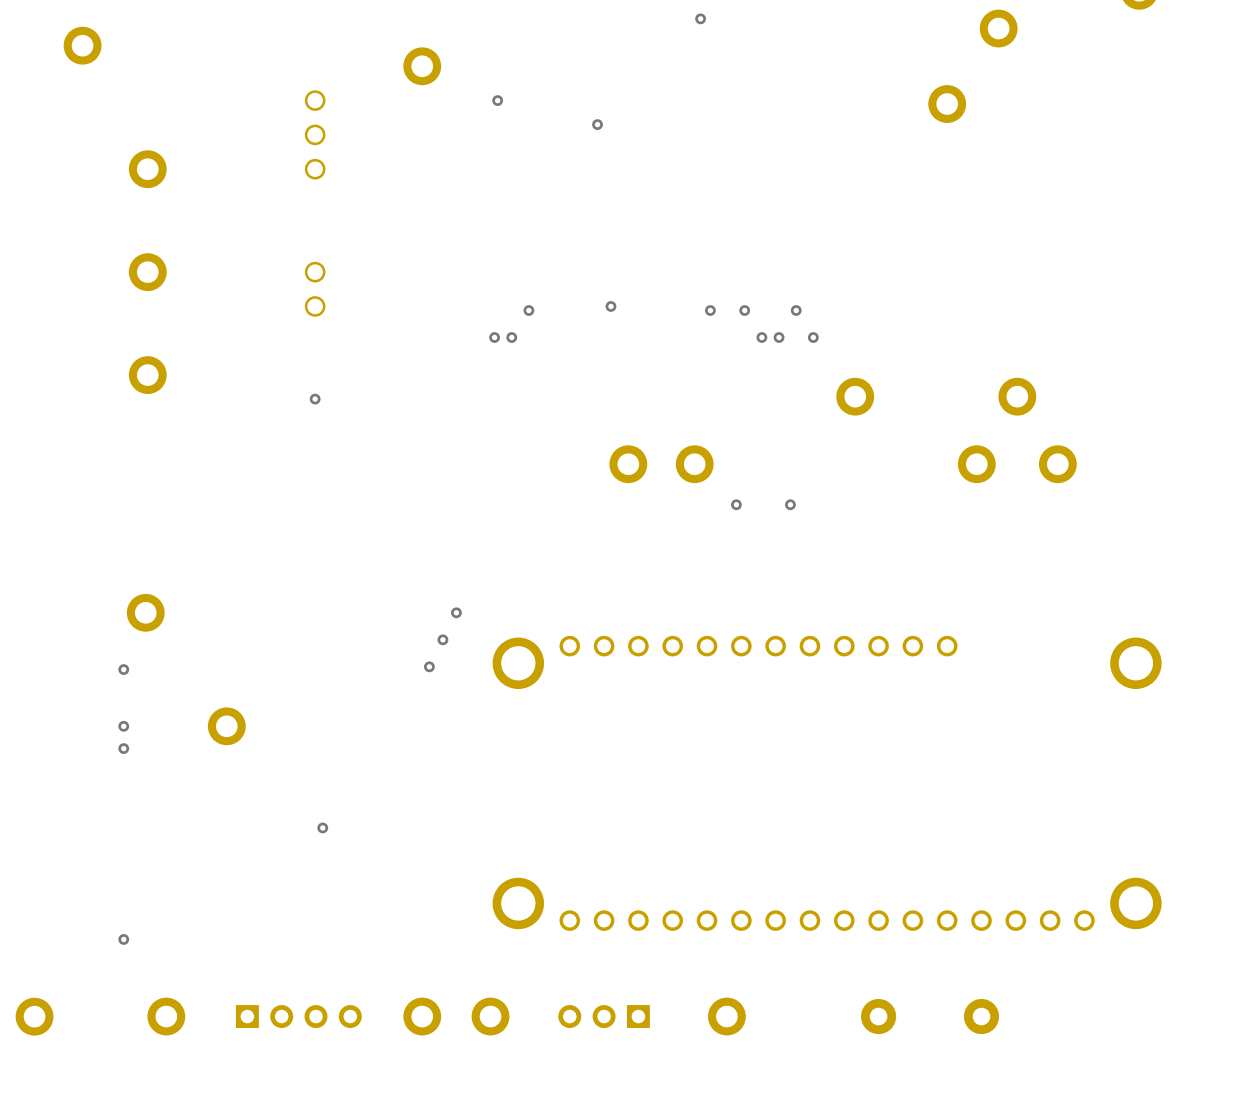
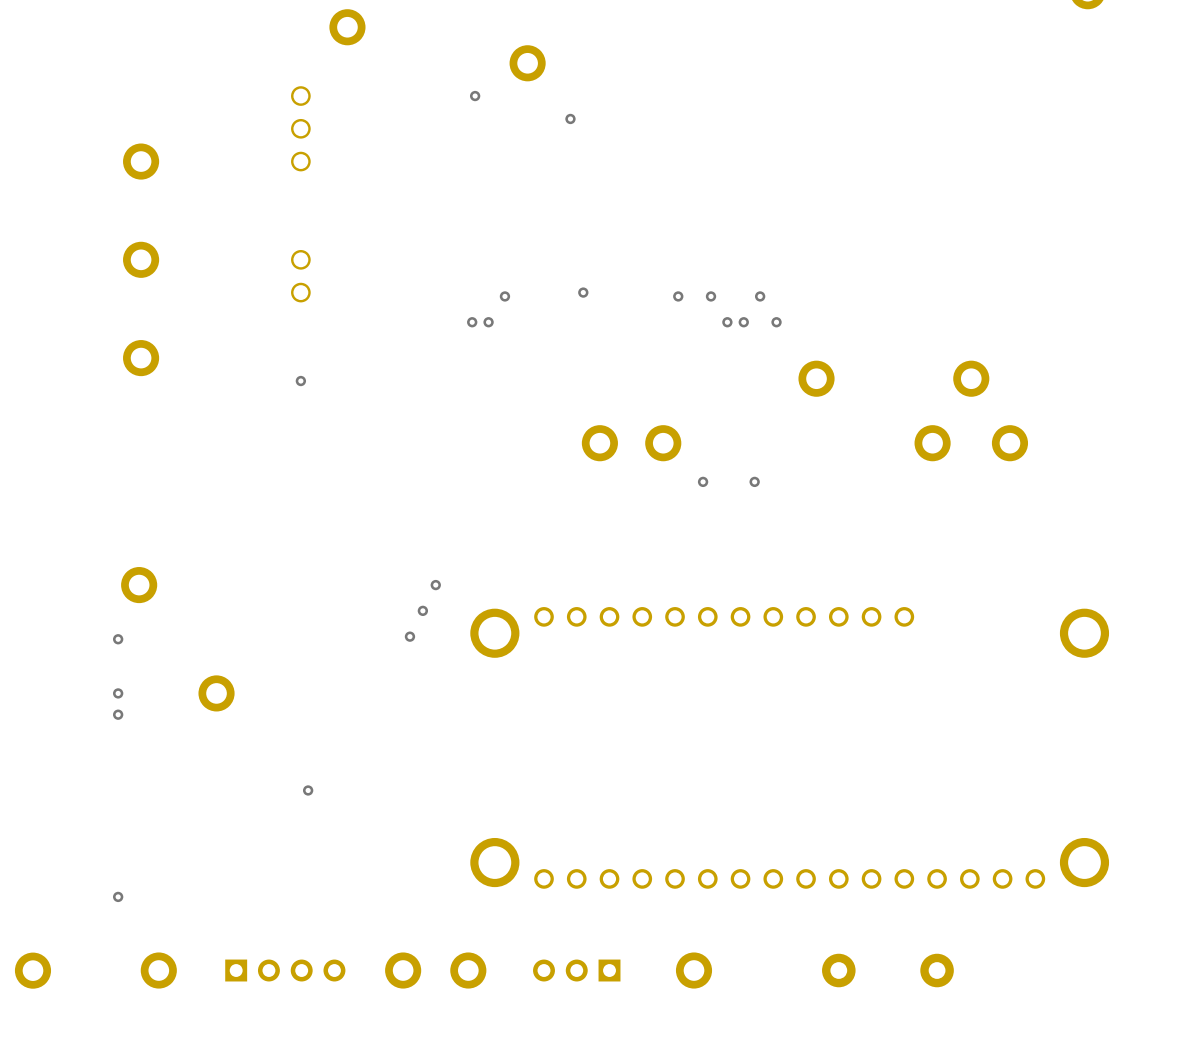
via: (700, 18) -> none
part: none -> (347, 27)
part: (998, 28) -> none
part: (82, 45) -> none
part: (422, 66) -> none
part: none -> (527, 63)
part: (947, 104) -> none

